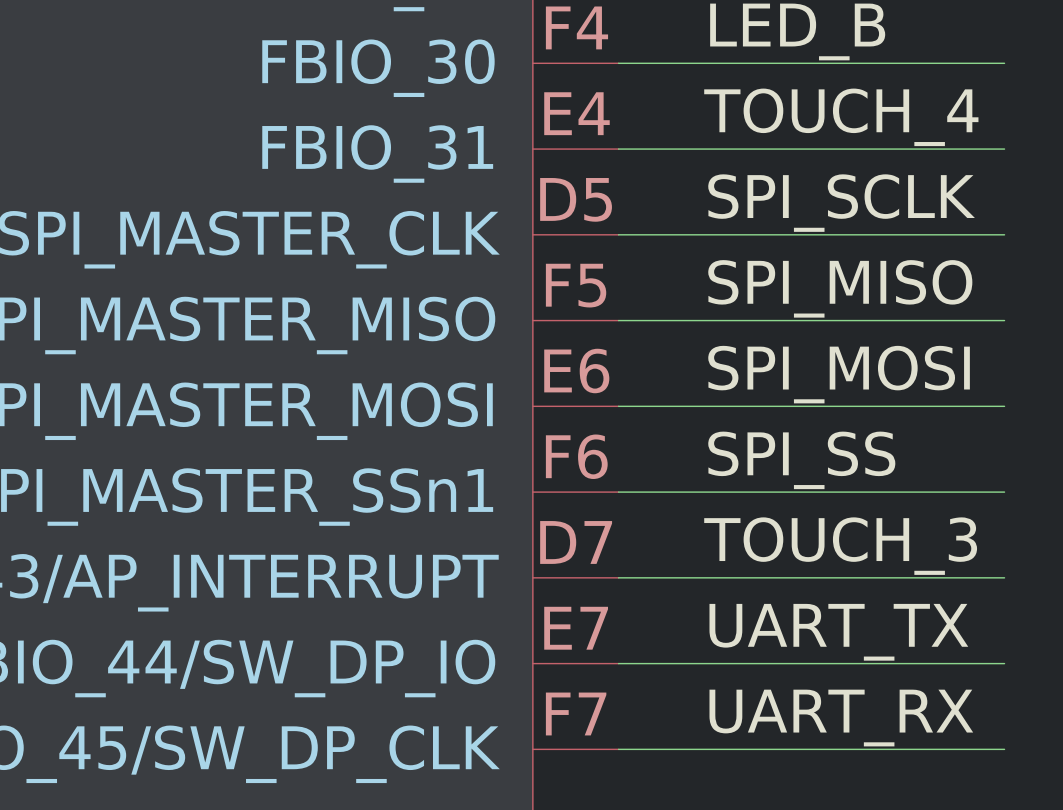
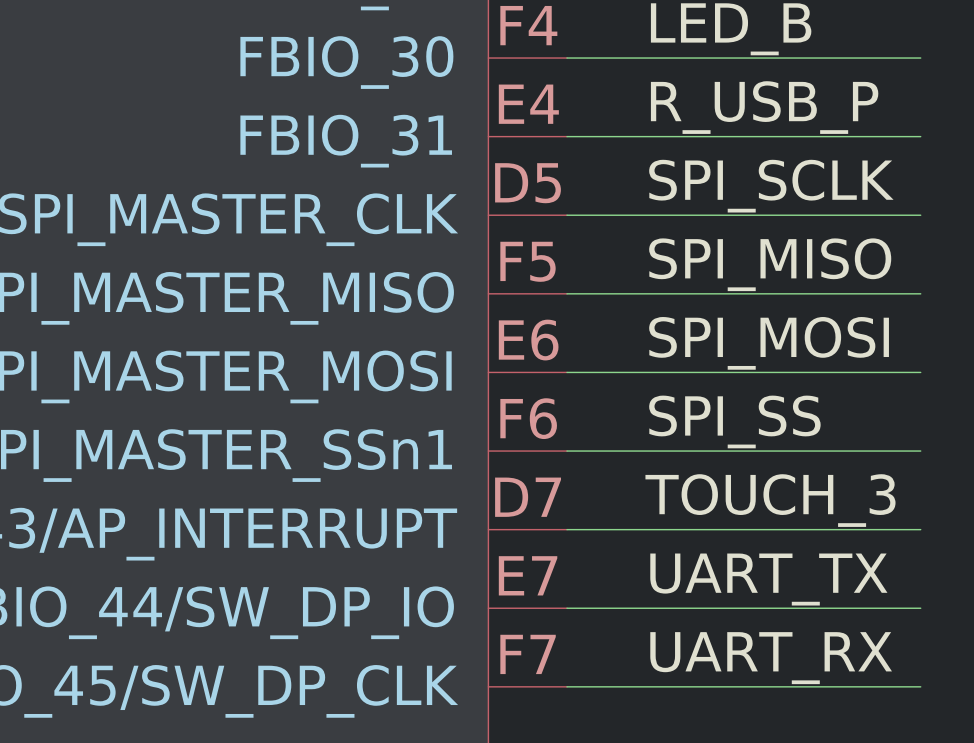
label: TOUCH_4 (841, 117) -> R_USB_P (764, 107)

